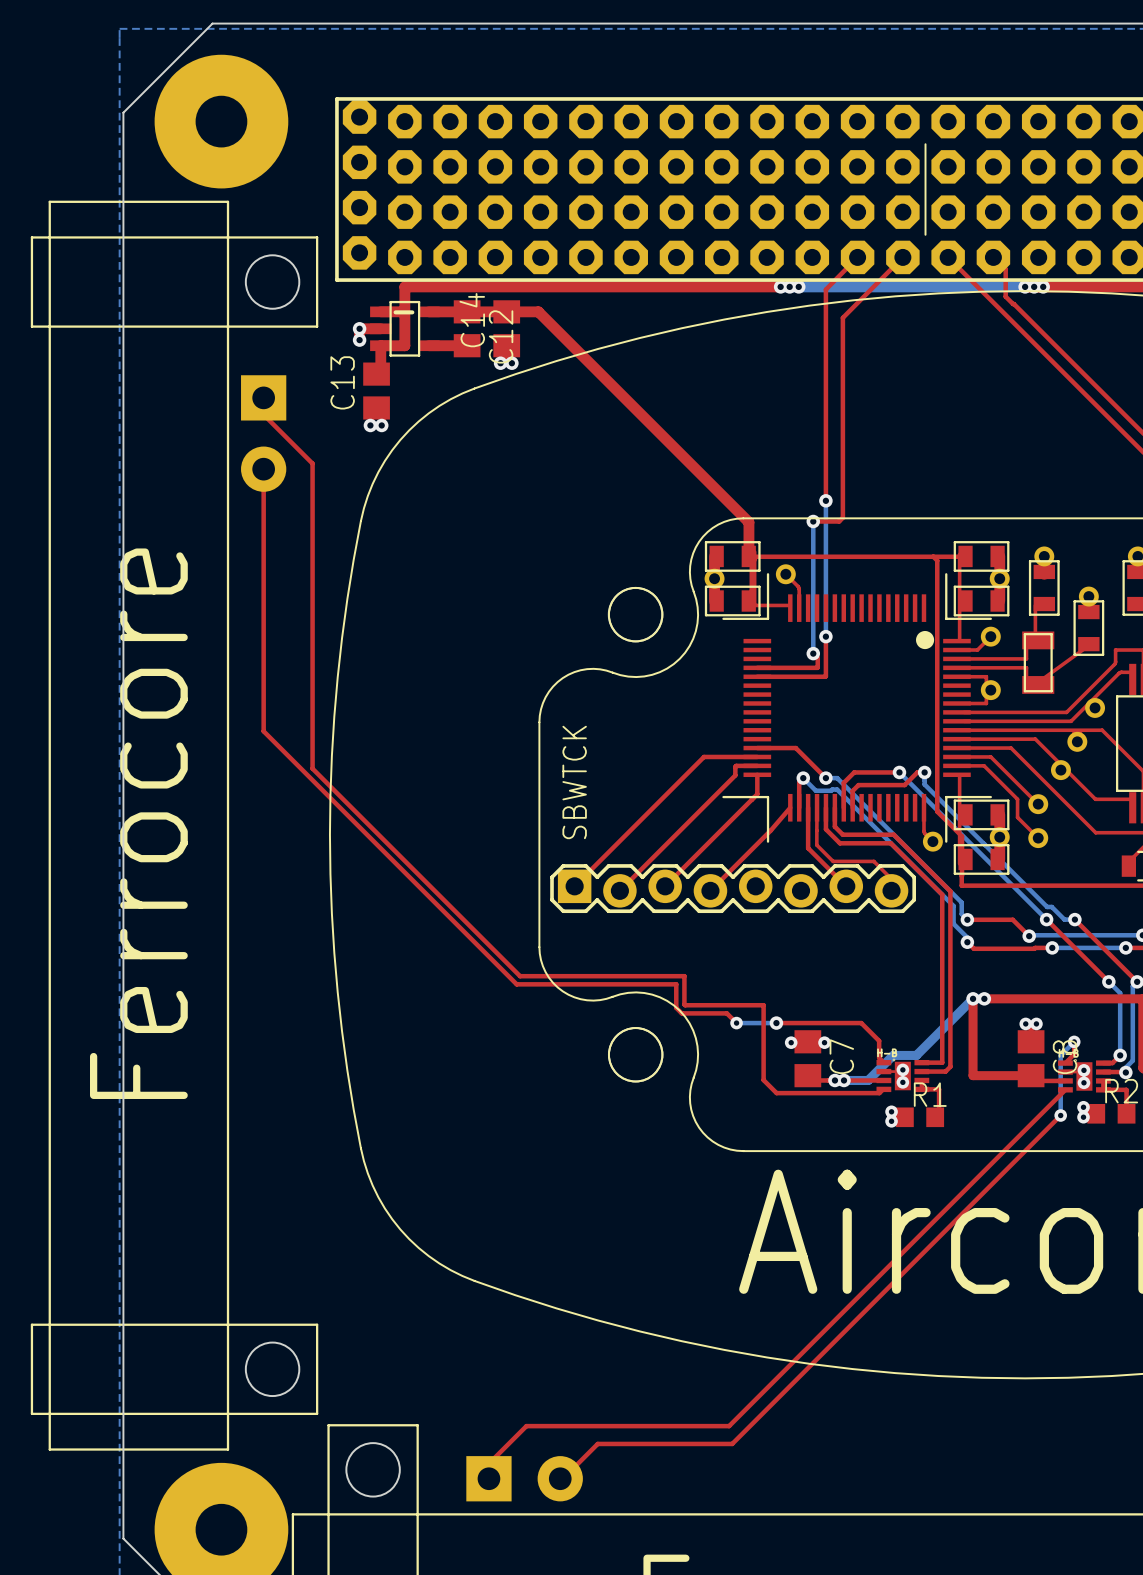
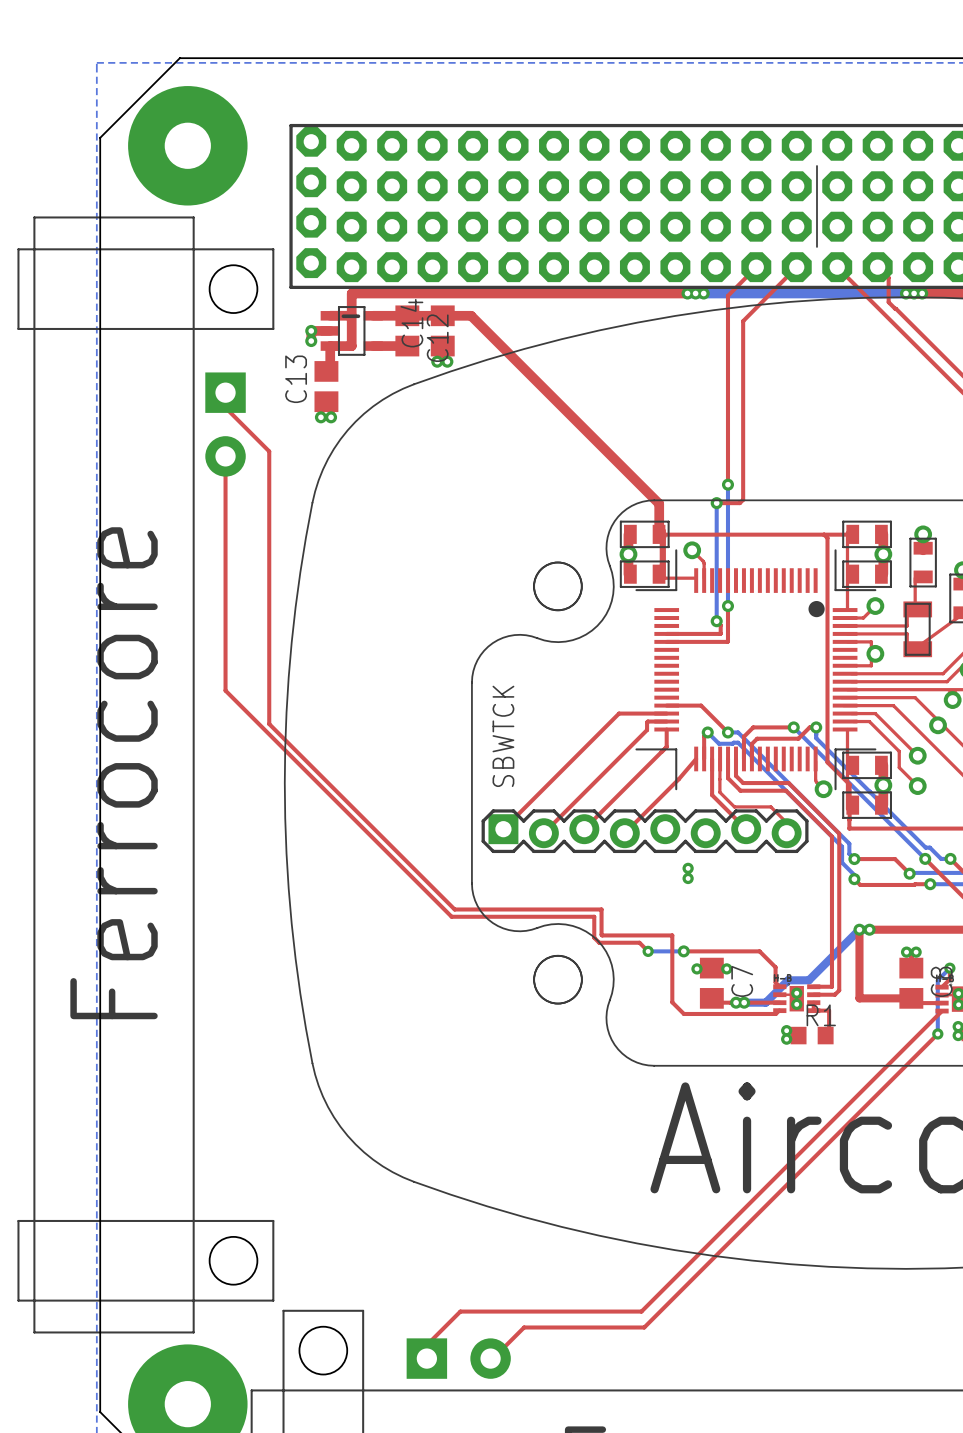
via: none -> (688, 868)
via: none -> (688, 878)

